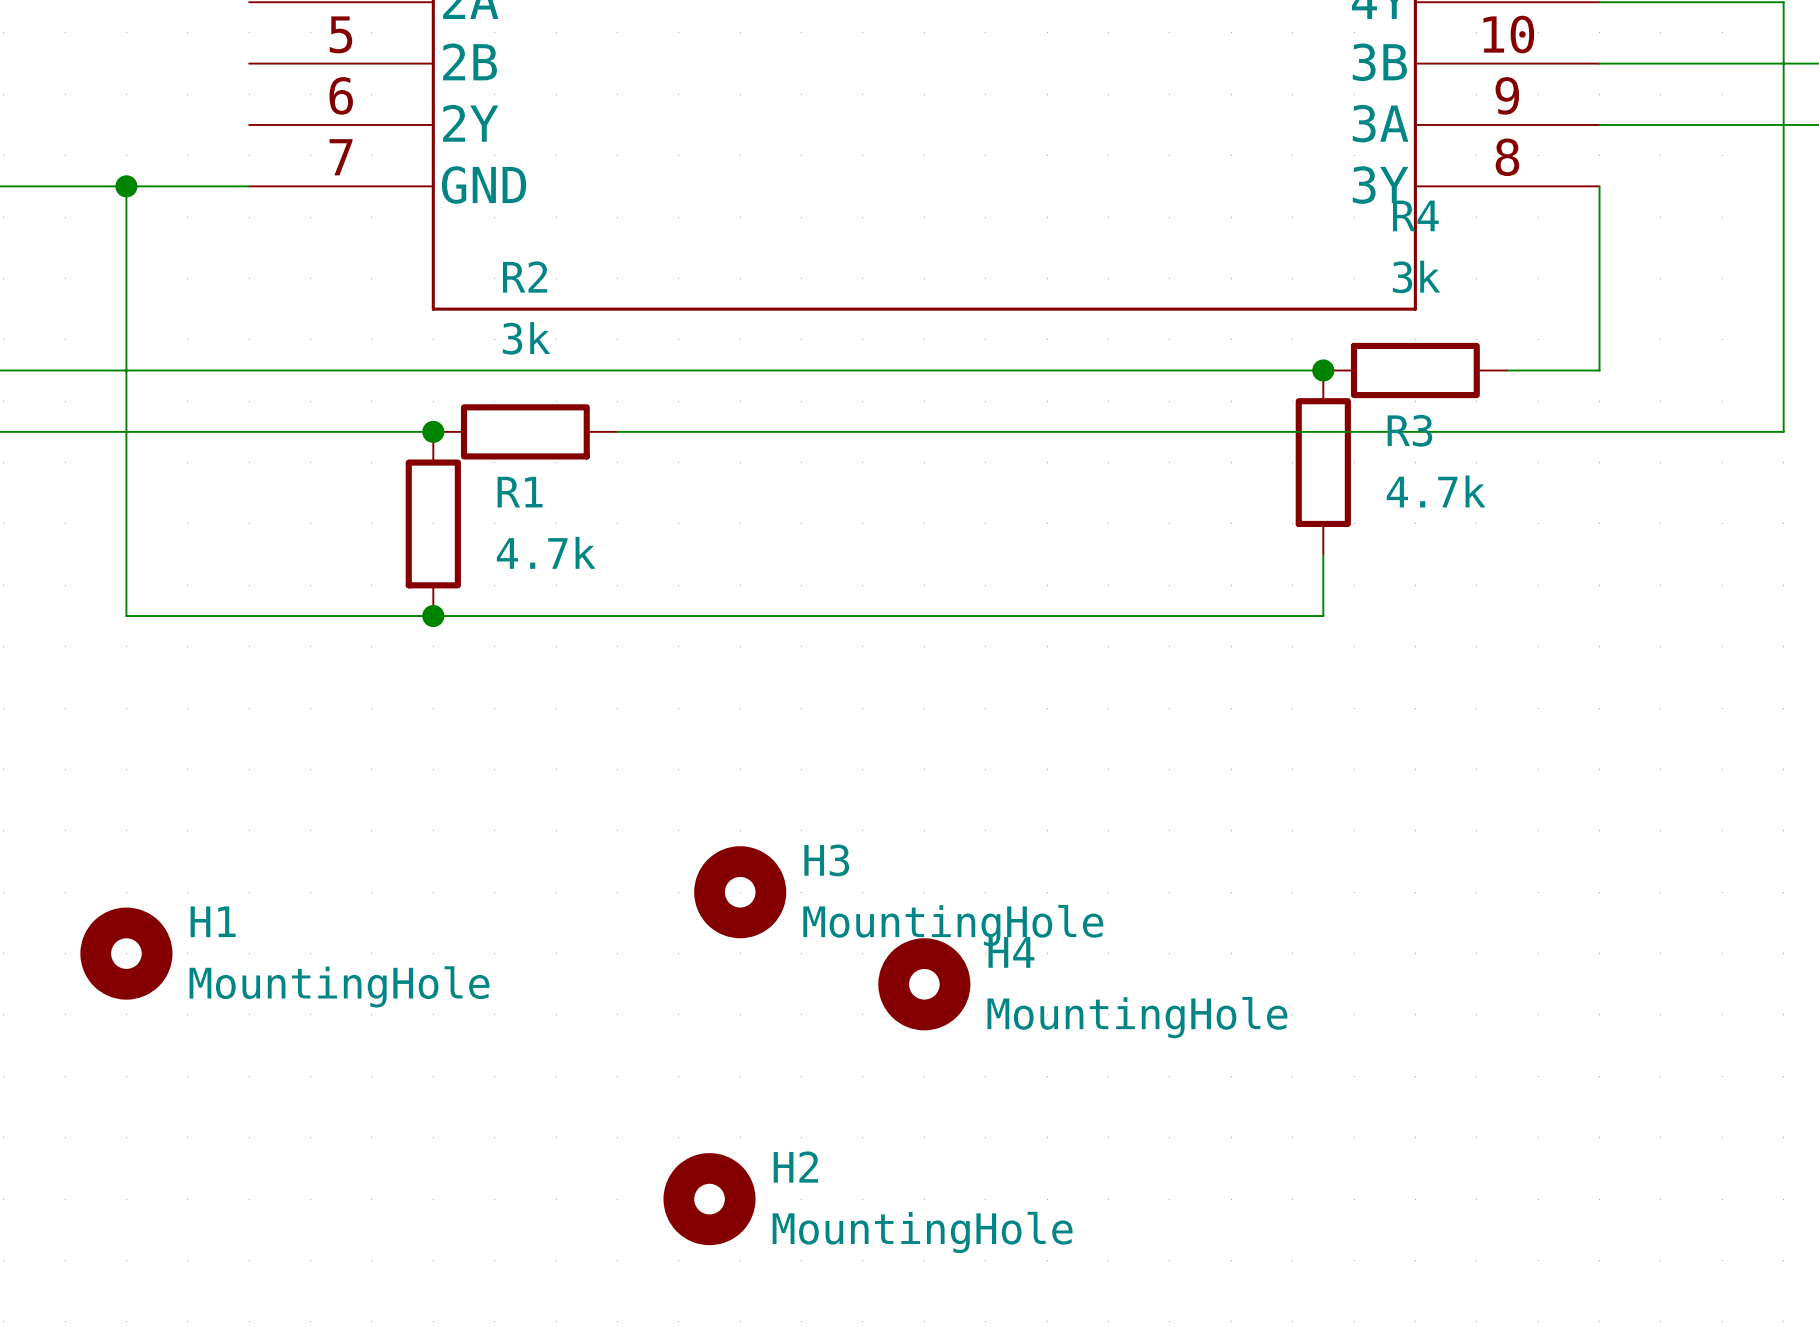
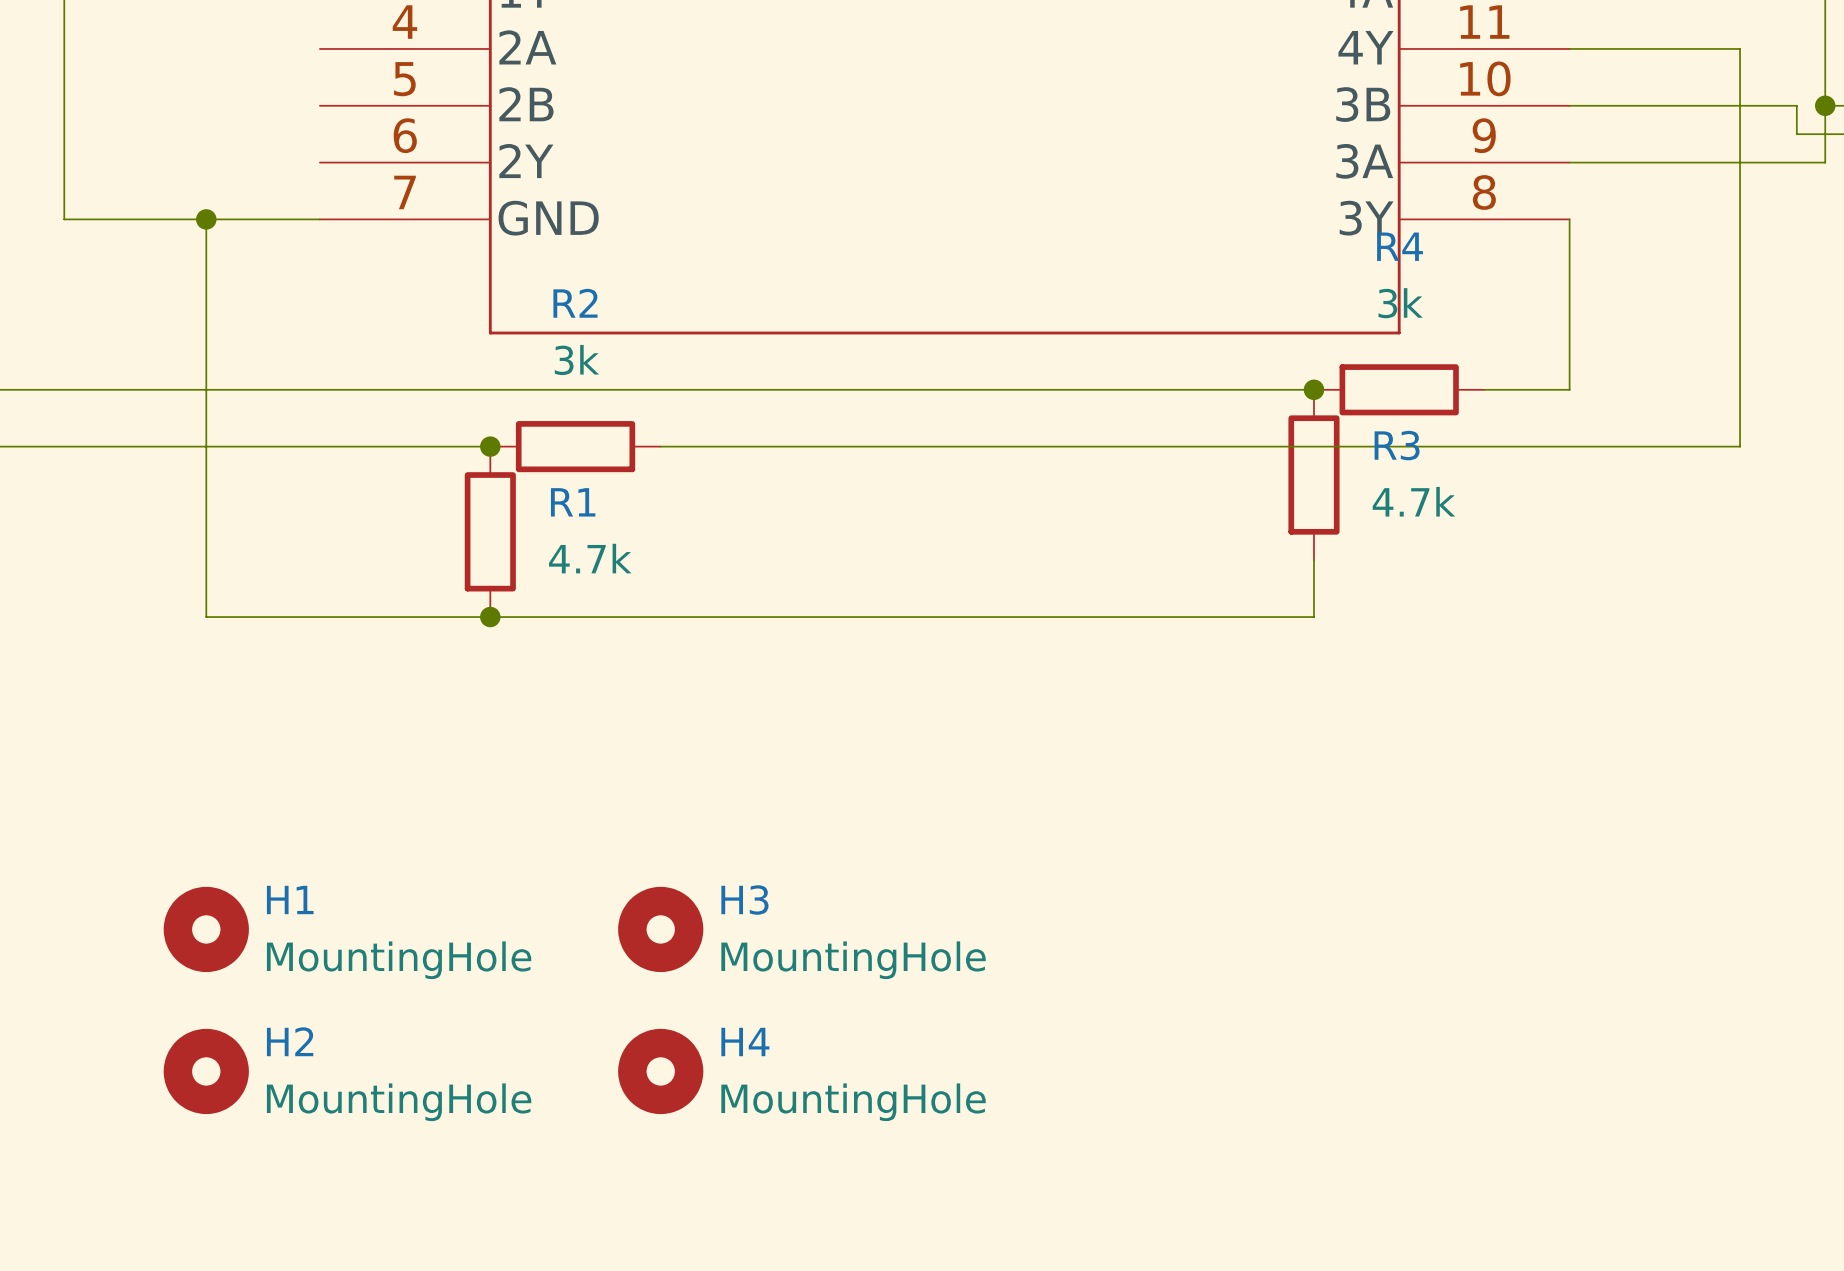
H3 position: (740, 892) -> (660, 929)
H4 position: (924, 984) -> (660, 1071)
H2 position: (709, 1199) -> (206, 1071)

